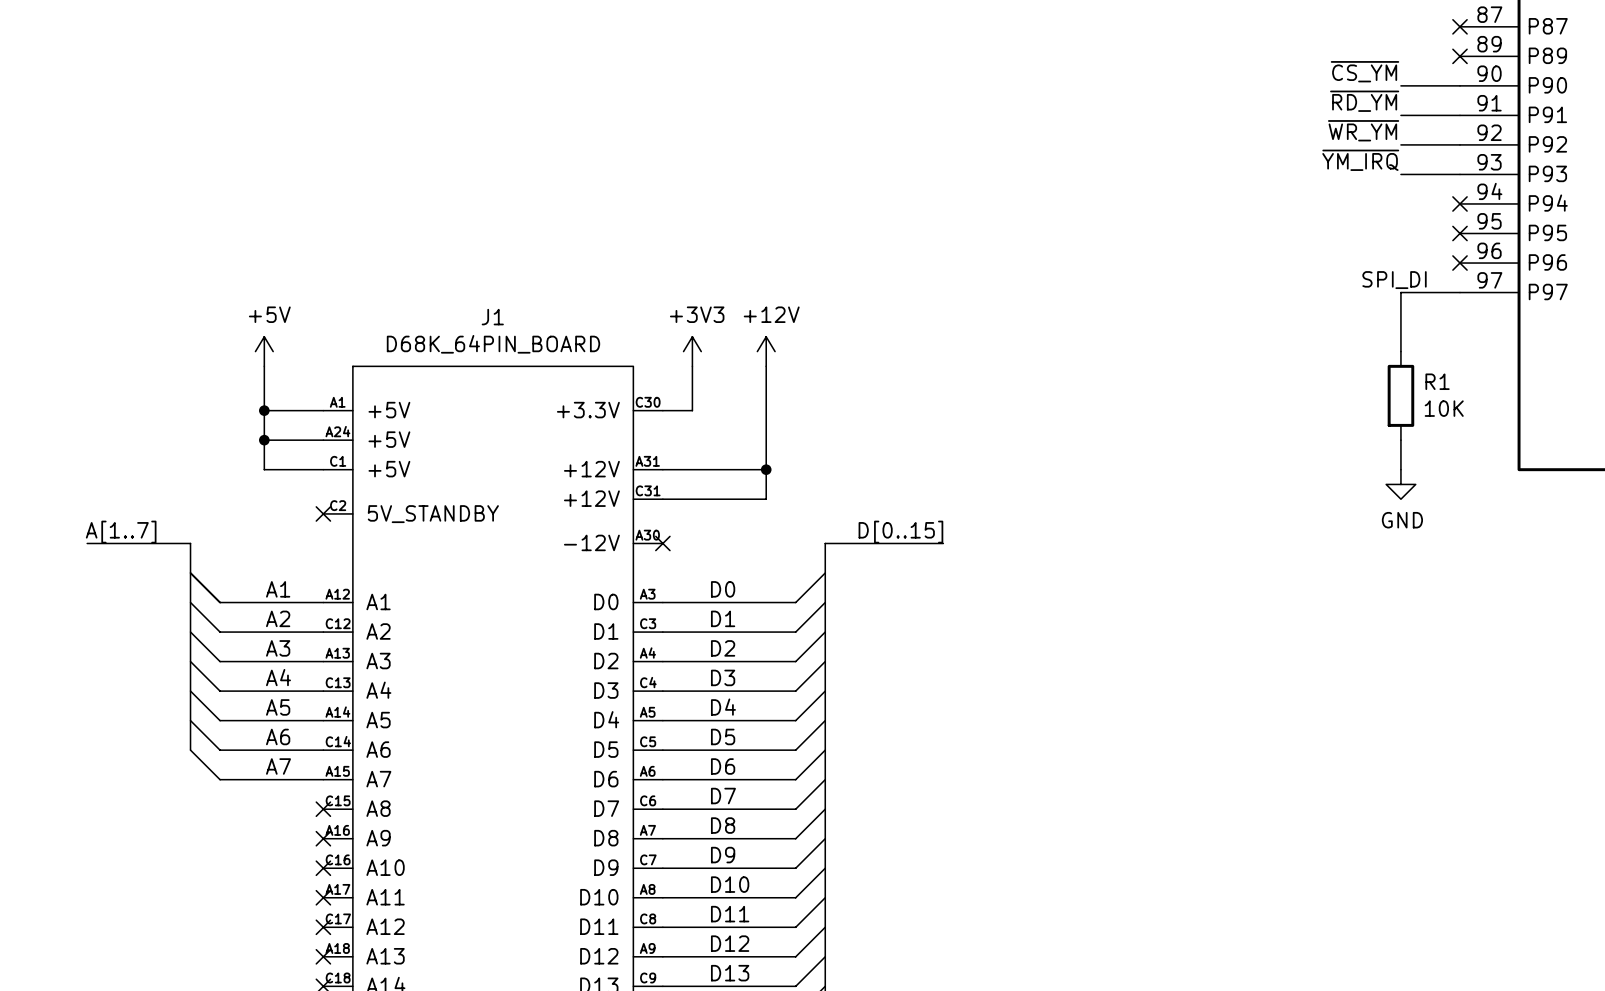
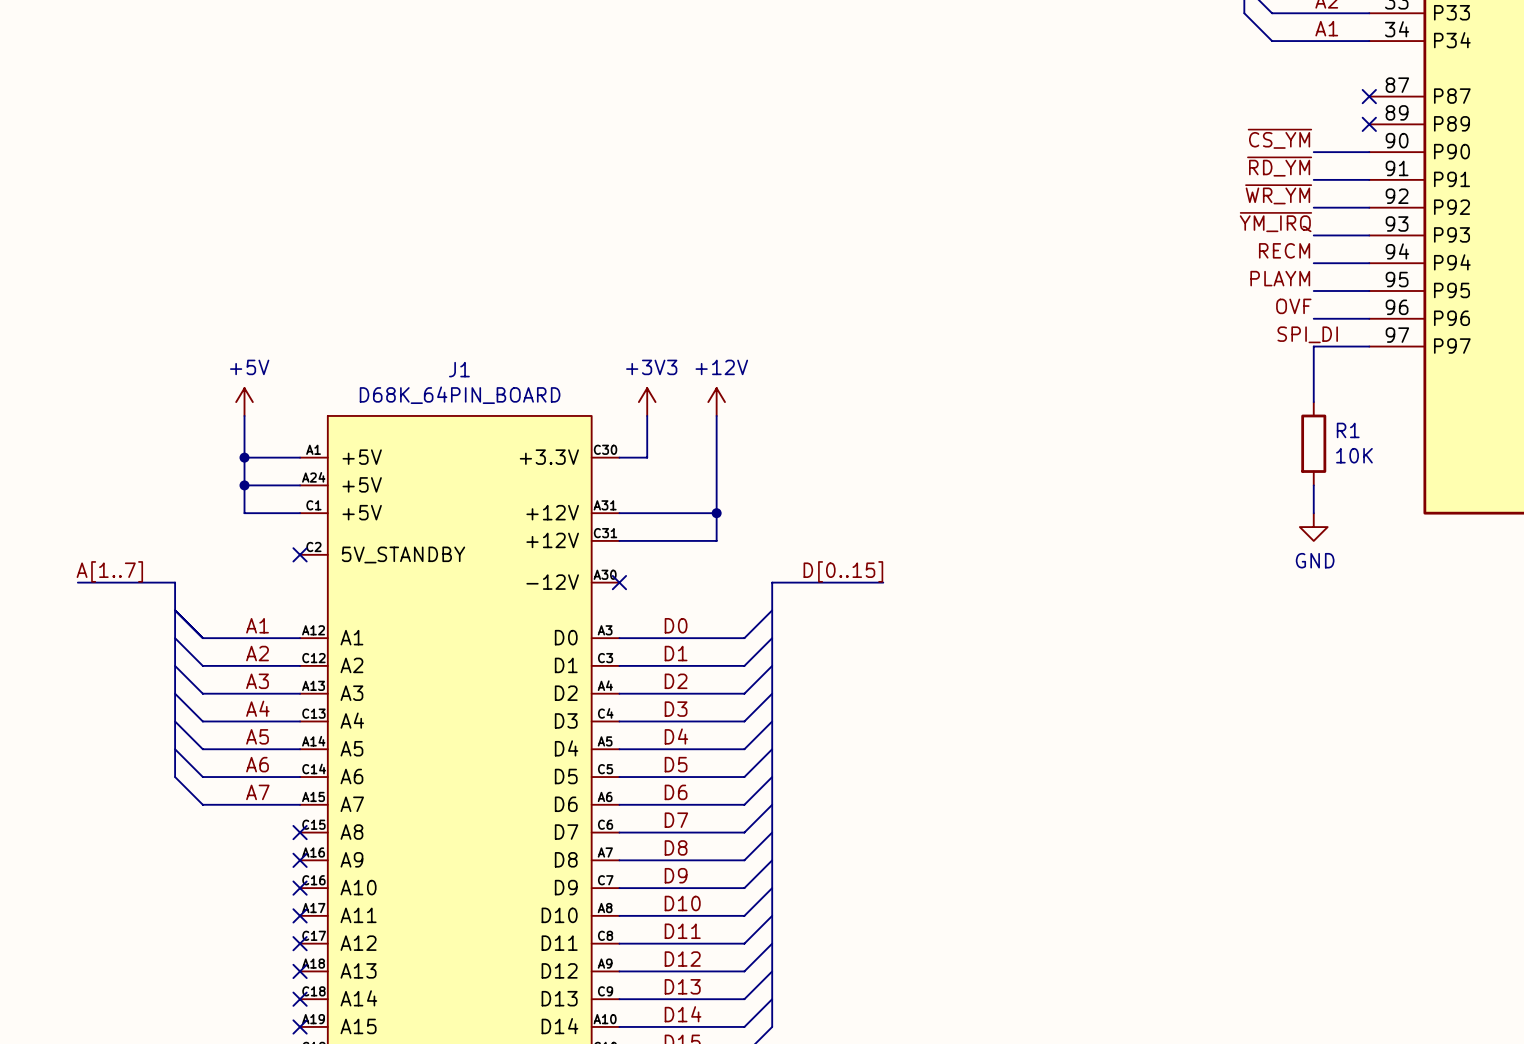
label: none -> RECM (1284, 250)
wire: none -> (1313, 263) (1369, 263)
no-connect mark: (1460, 203) -> none
label: none -> PLAYM (1280, 278)
wire: none -> (1313, 290) (1369, 290)
no-connect mark: (1460, 233) -> none
label: none -> OVF (1293, 306)
wire: none -> (1313, 318) (1369, 318)
no-connect mark: (1460, 263) -> none

